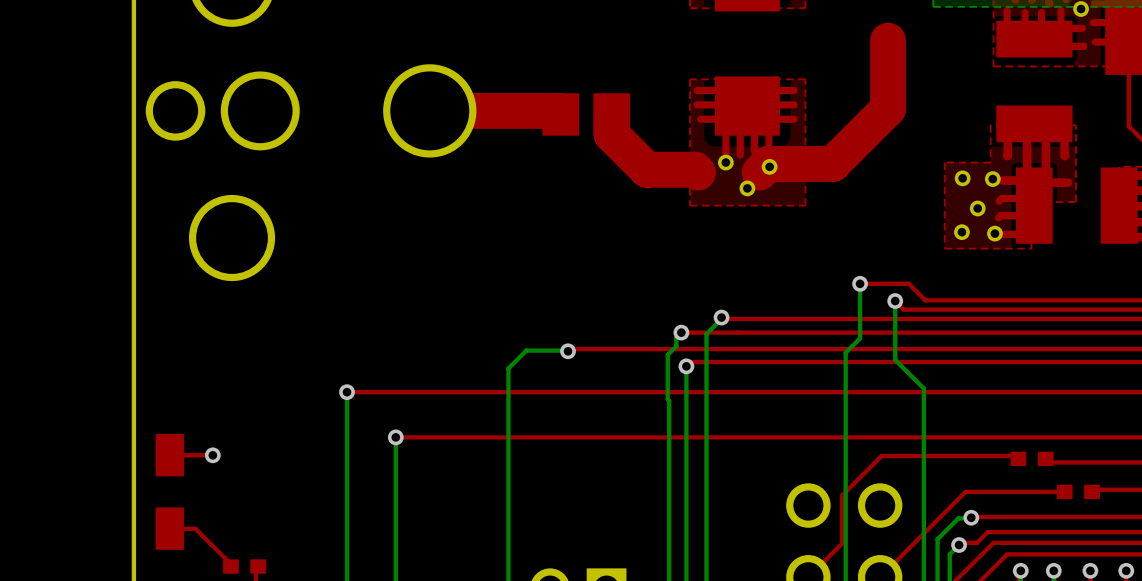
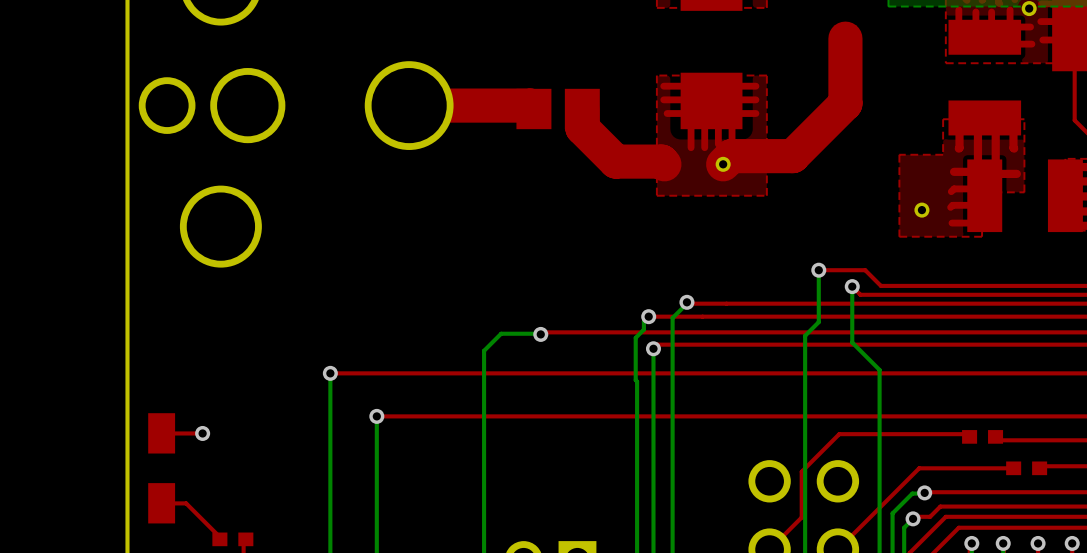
part: (725, 162) -> none
part: (769, 166) -> none
part: none -> (723, 164)
part: (962, 178) -> none
part: (992, 179) -> none
part: (747, 188) -> none
part: (977, 208) -> none
part: none -> (921, 210)
part: (961, 232) -> none
part: (994, 233) -> none

